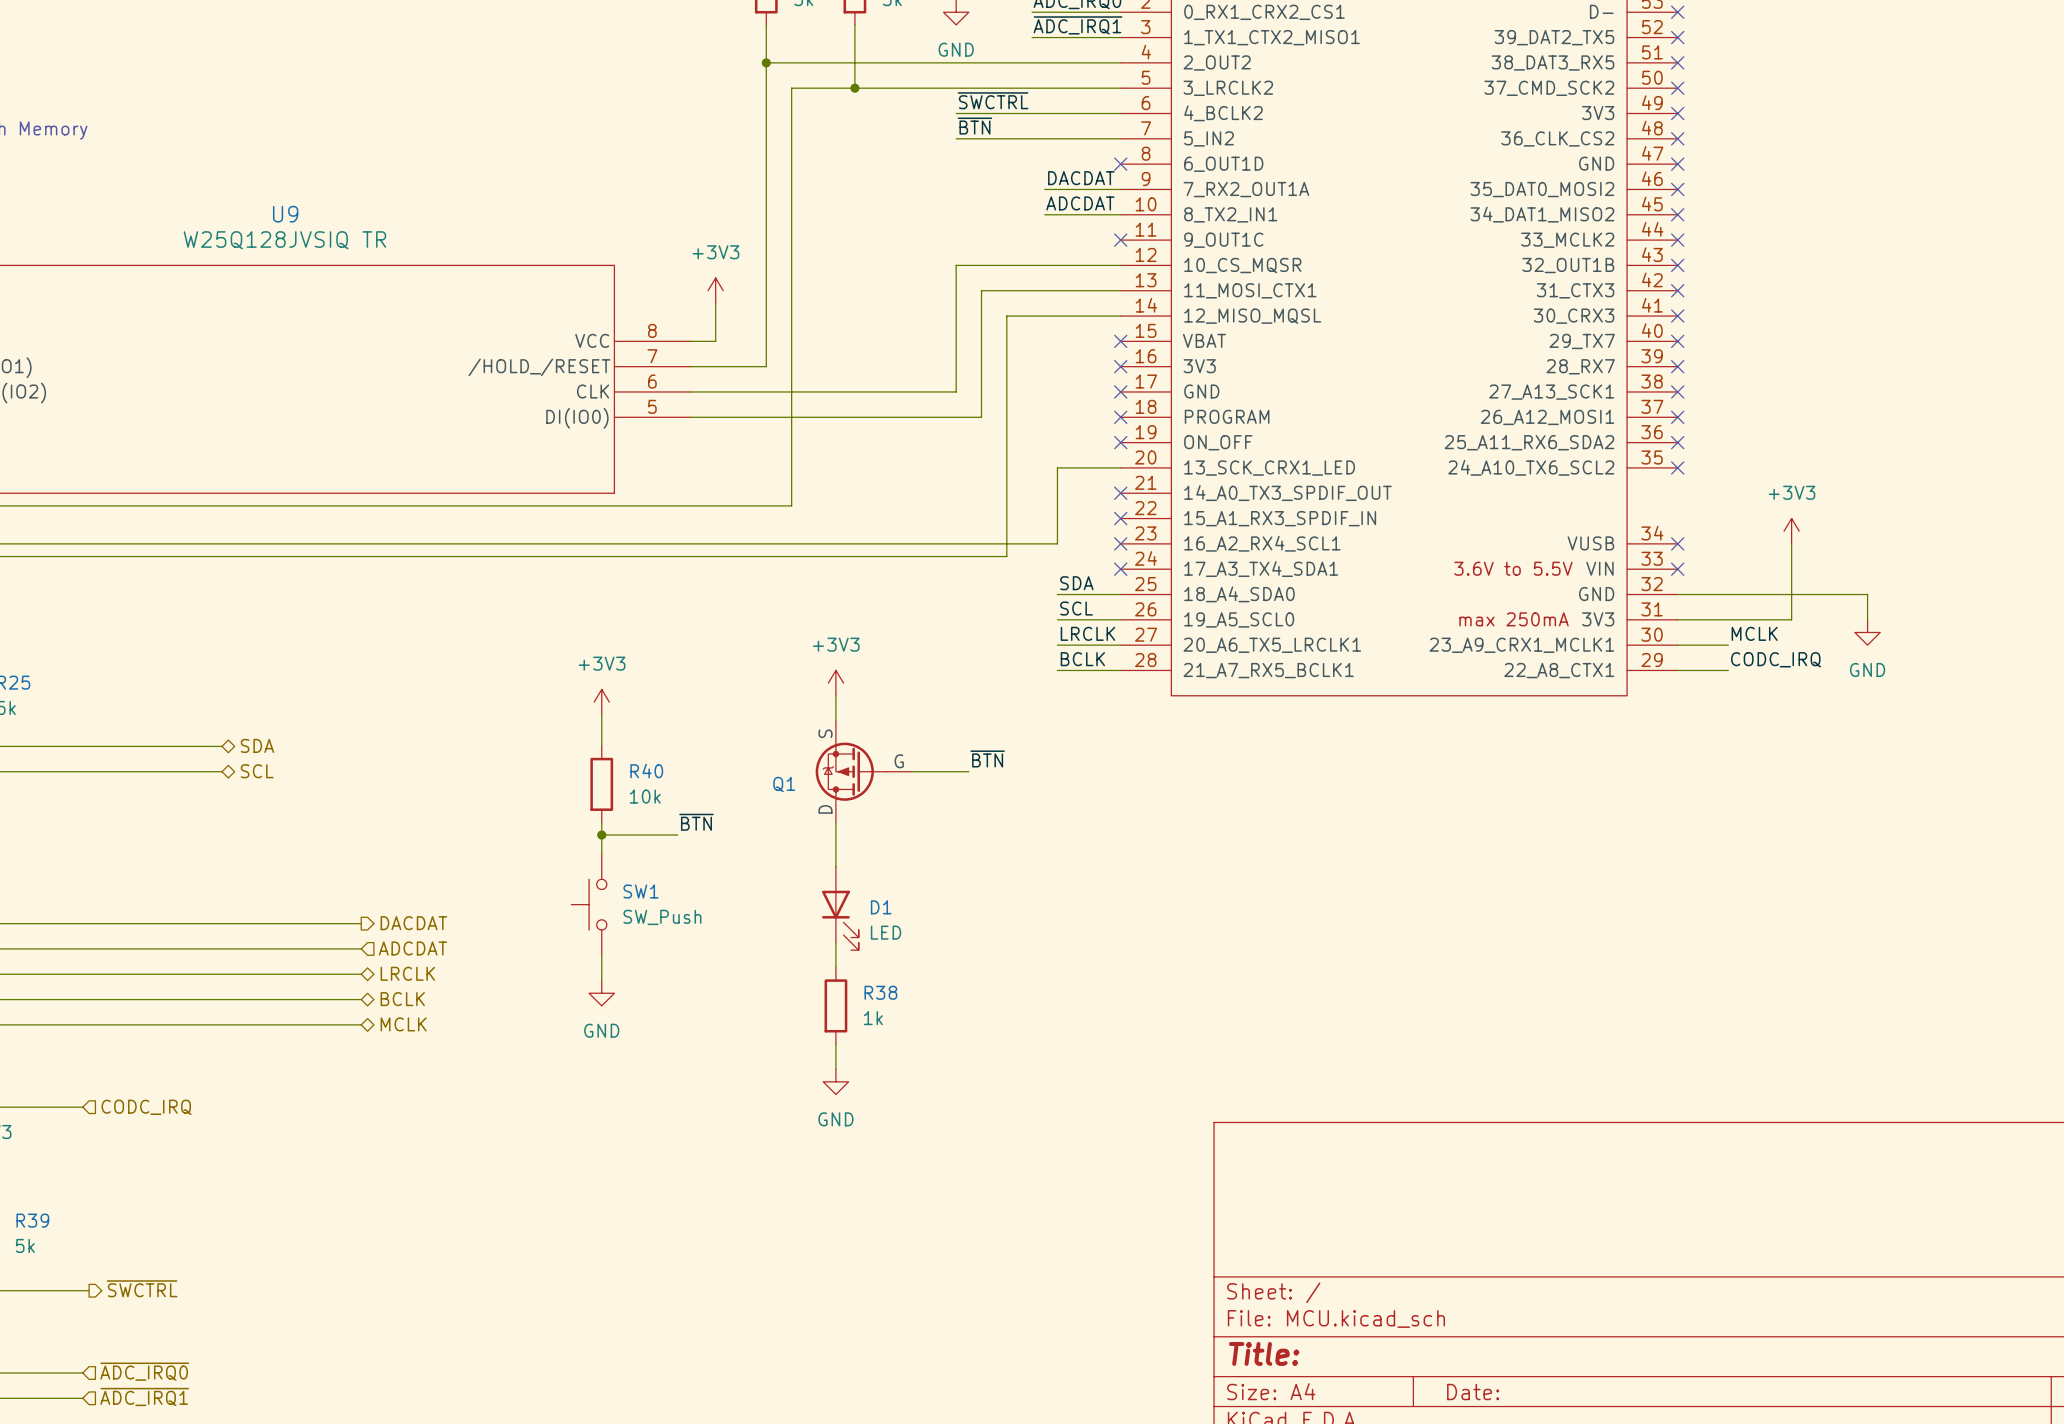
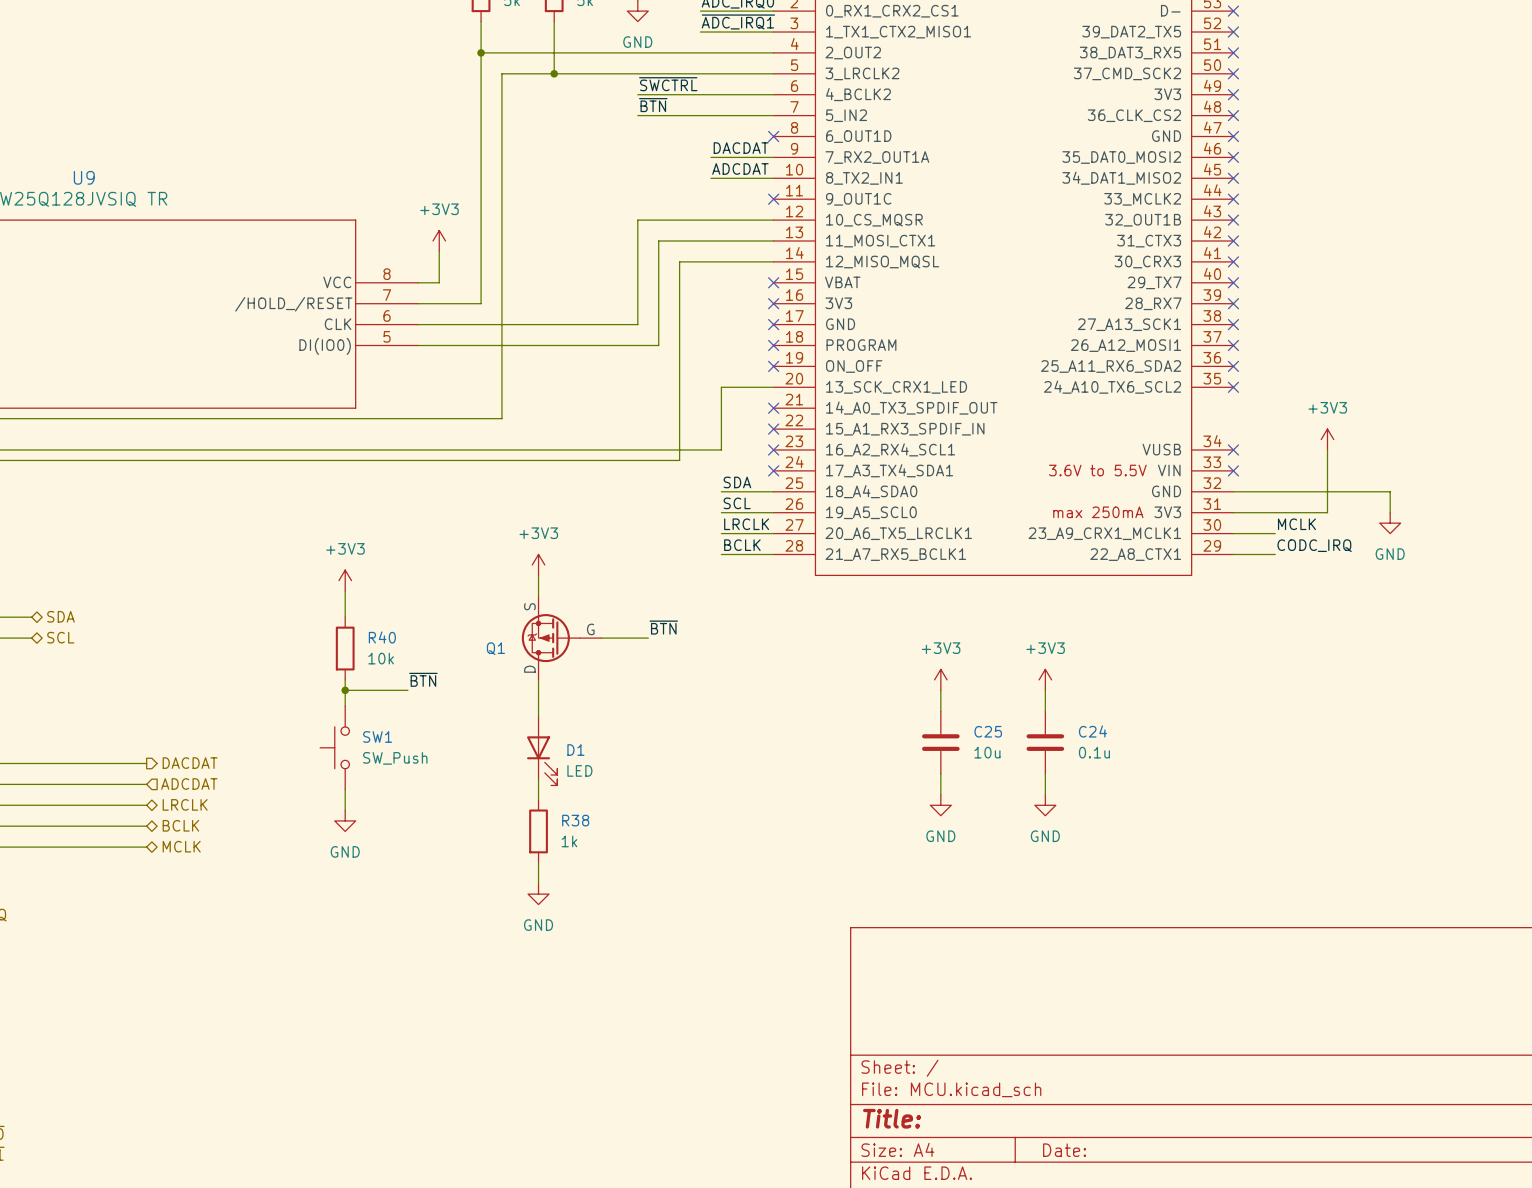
power symbol: none -> +3V3 (940, 679)
power symbol: none -> +3V3 (1045, 679)
wire: none -> (940, 690) (940, 711)
wire: none -> (1045, 690) (1045, 711)
C25: none -> 10u (940, 742)
C24: none -> 0.1u (1045, 742)
wire: none -> (940, 773) (940, 794)
wire: none -> (1045, 773) (1045, 794)
power symbol: none -> GND (940, 805)
power symbol: none -> GND (1045, 805)

